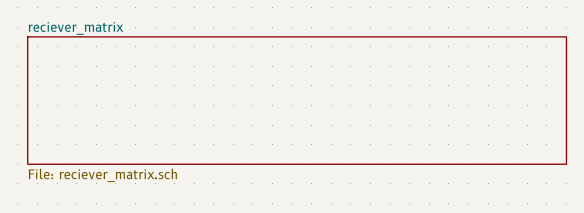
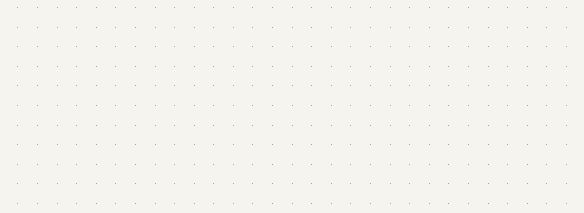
sheet reciever_matrix: File: reciever_matrix.sch (297, 100) -> none

